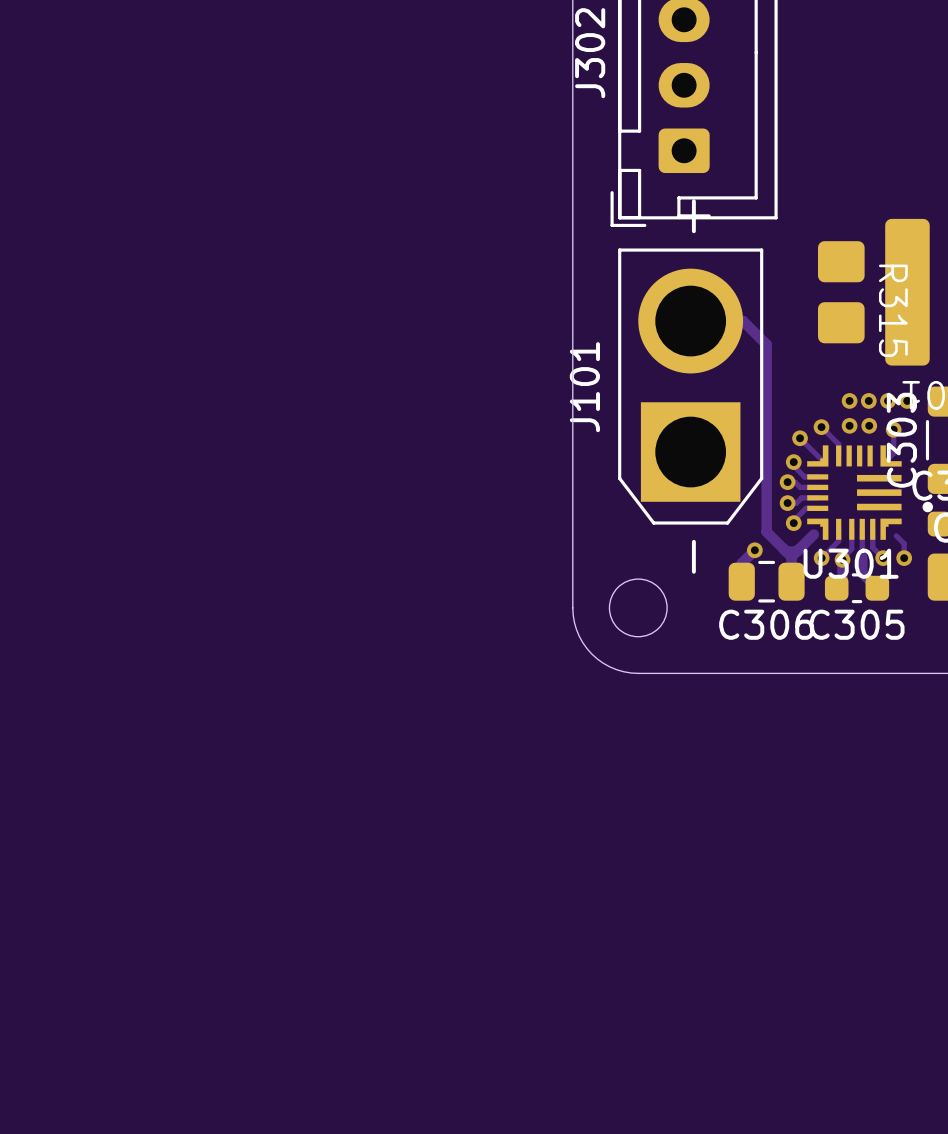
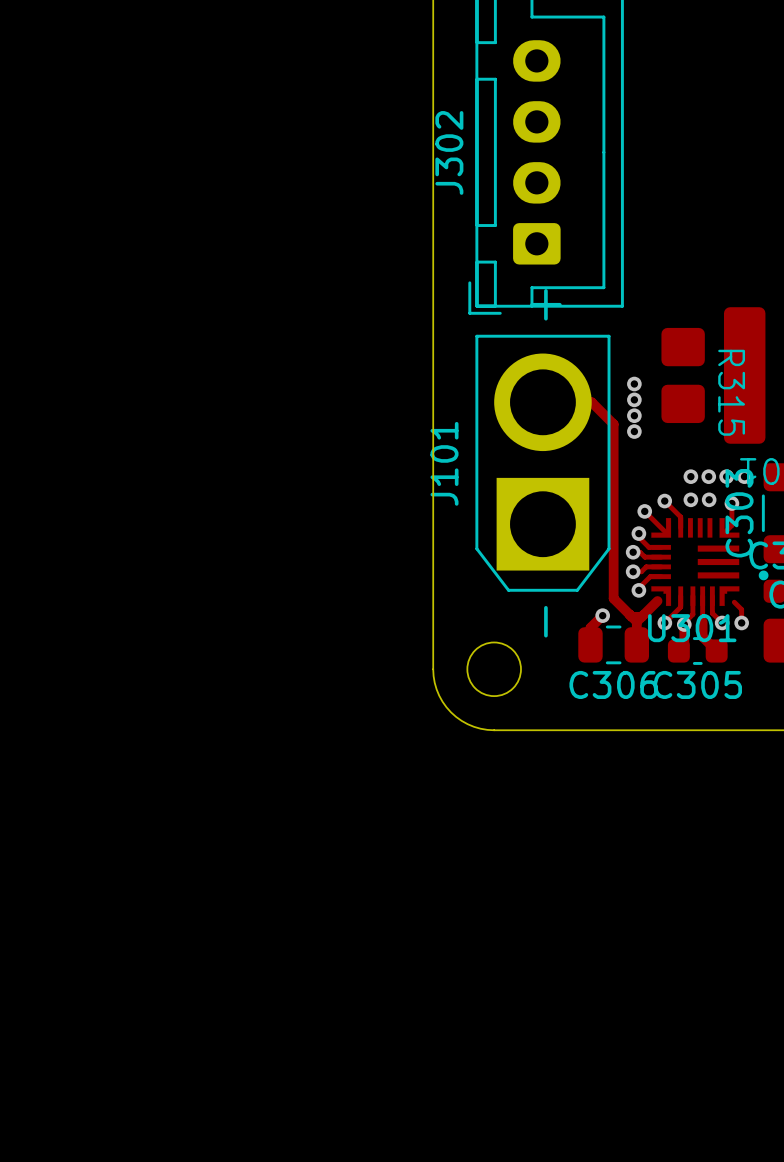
via: none -> (634, 384)
via: none -> (634, 399)
via: none -> (634, 415)
via: none -> (634, 431)

